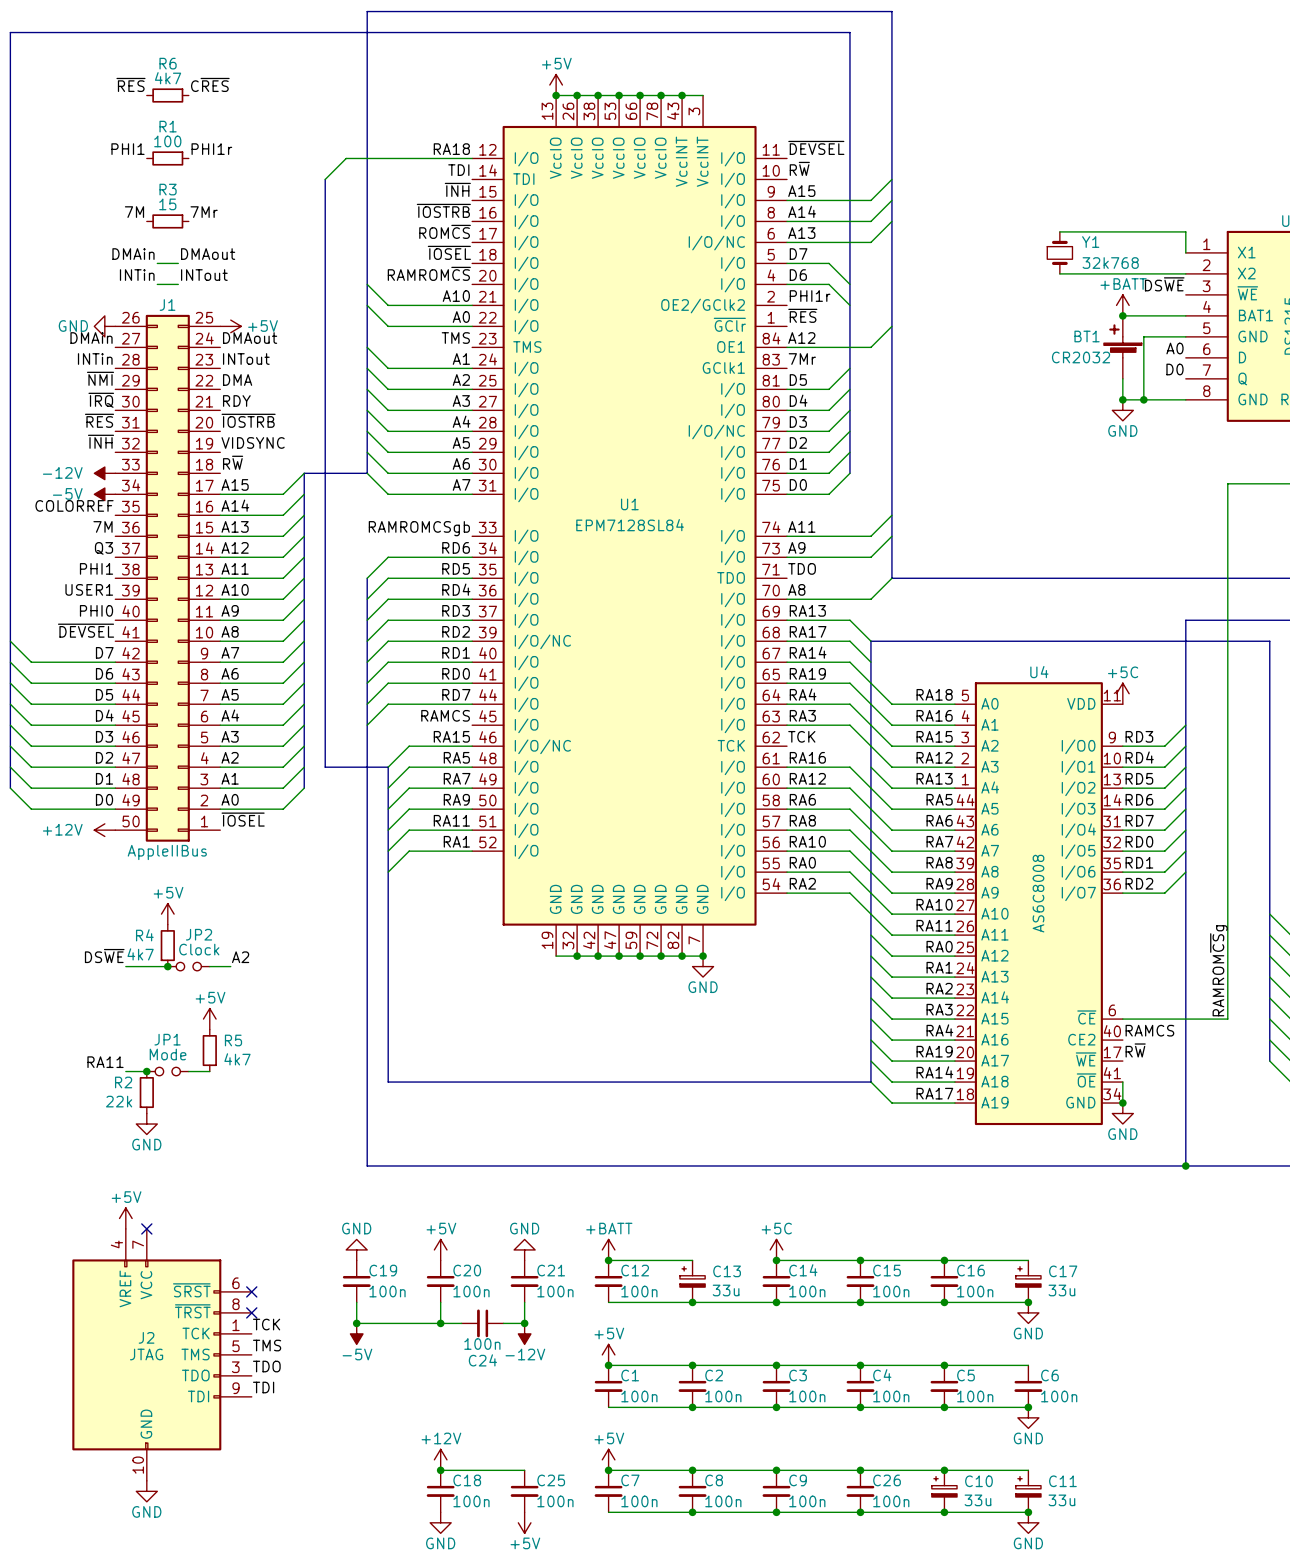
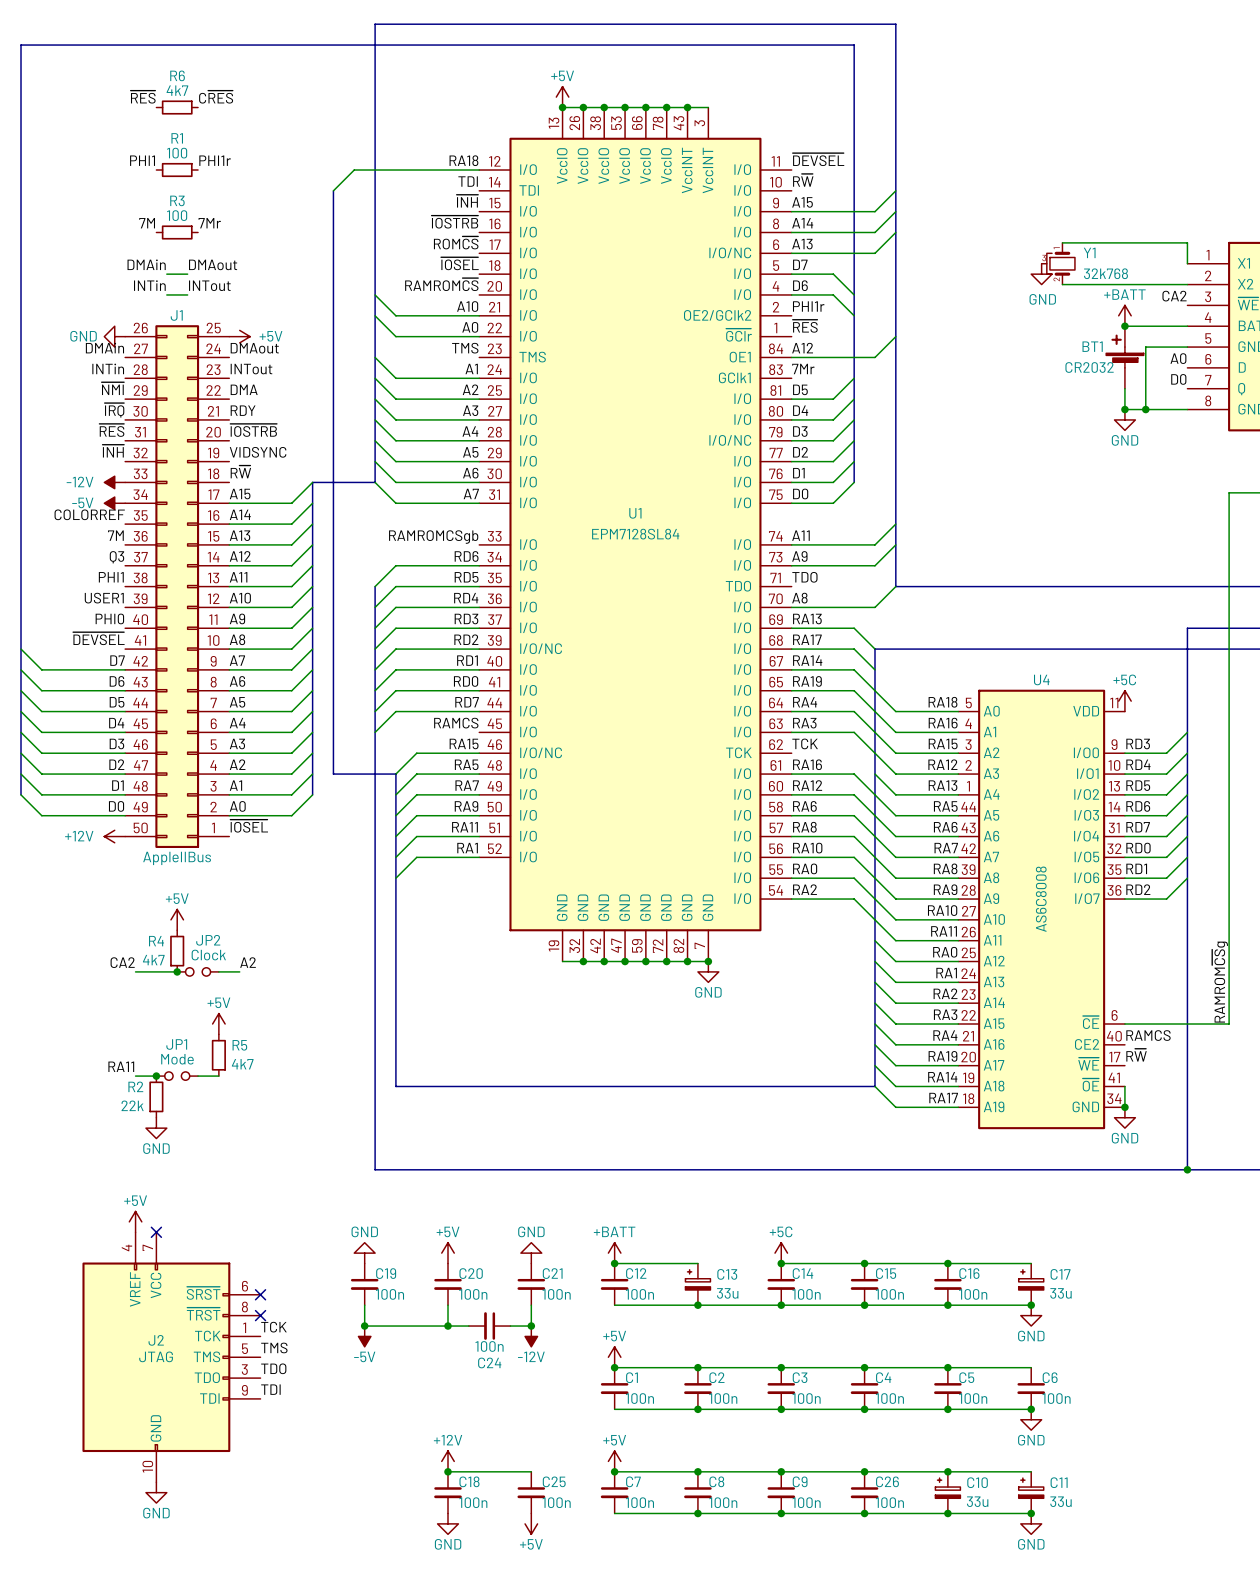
R3 value: 15 (167, 204) -> 100 (177, 215)
Y1 symbol: [1047, 231, 1073, 274] -> [1041, 242, 1075, 285]
power symbol: none -> GND (1041, 274)
label: DS~{WE} (1164, 284) -> CA2 (1174, 296)
label: DS~{WE} (104, 956) -> CA2 (122, 962)

